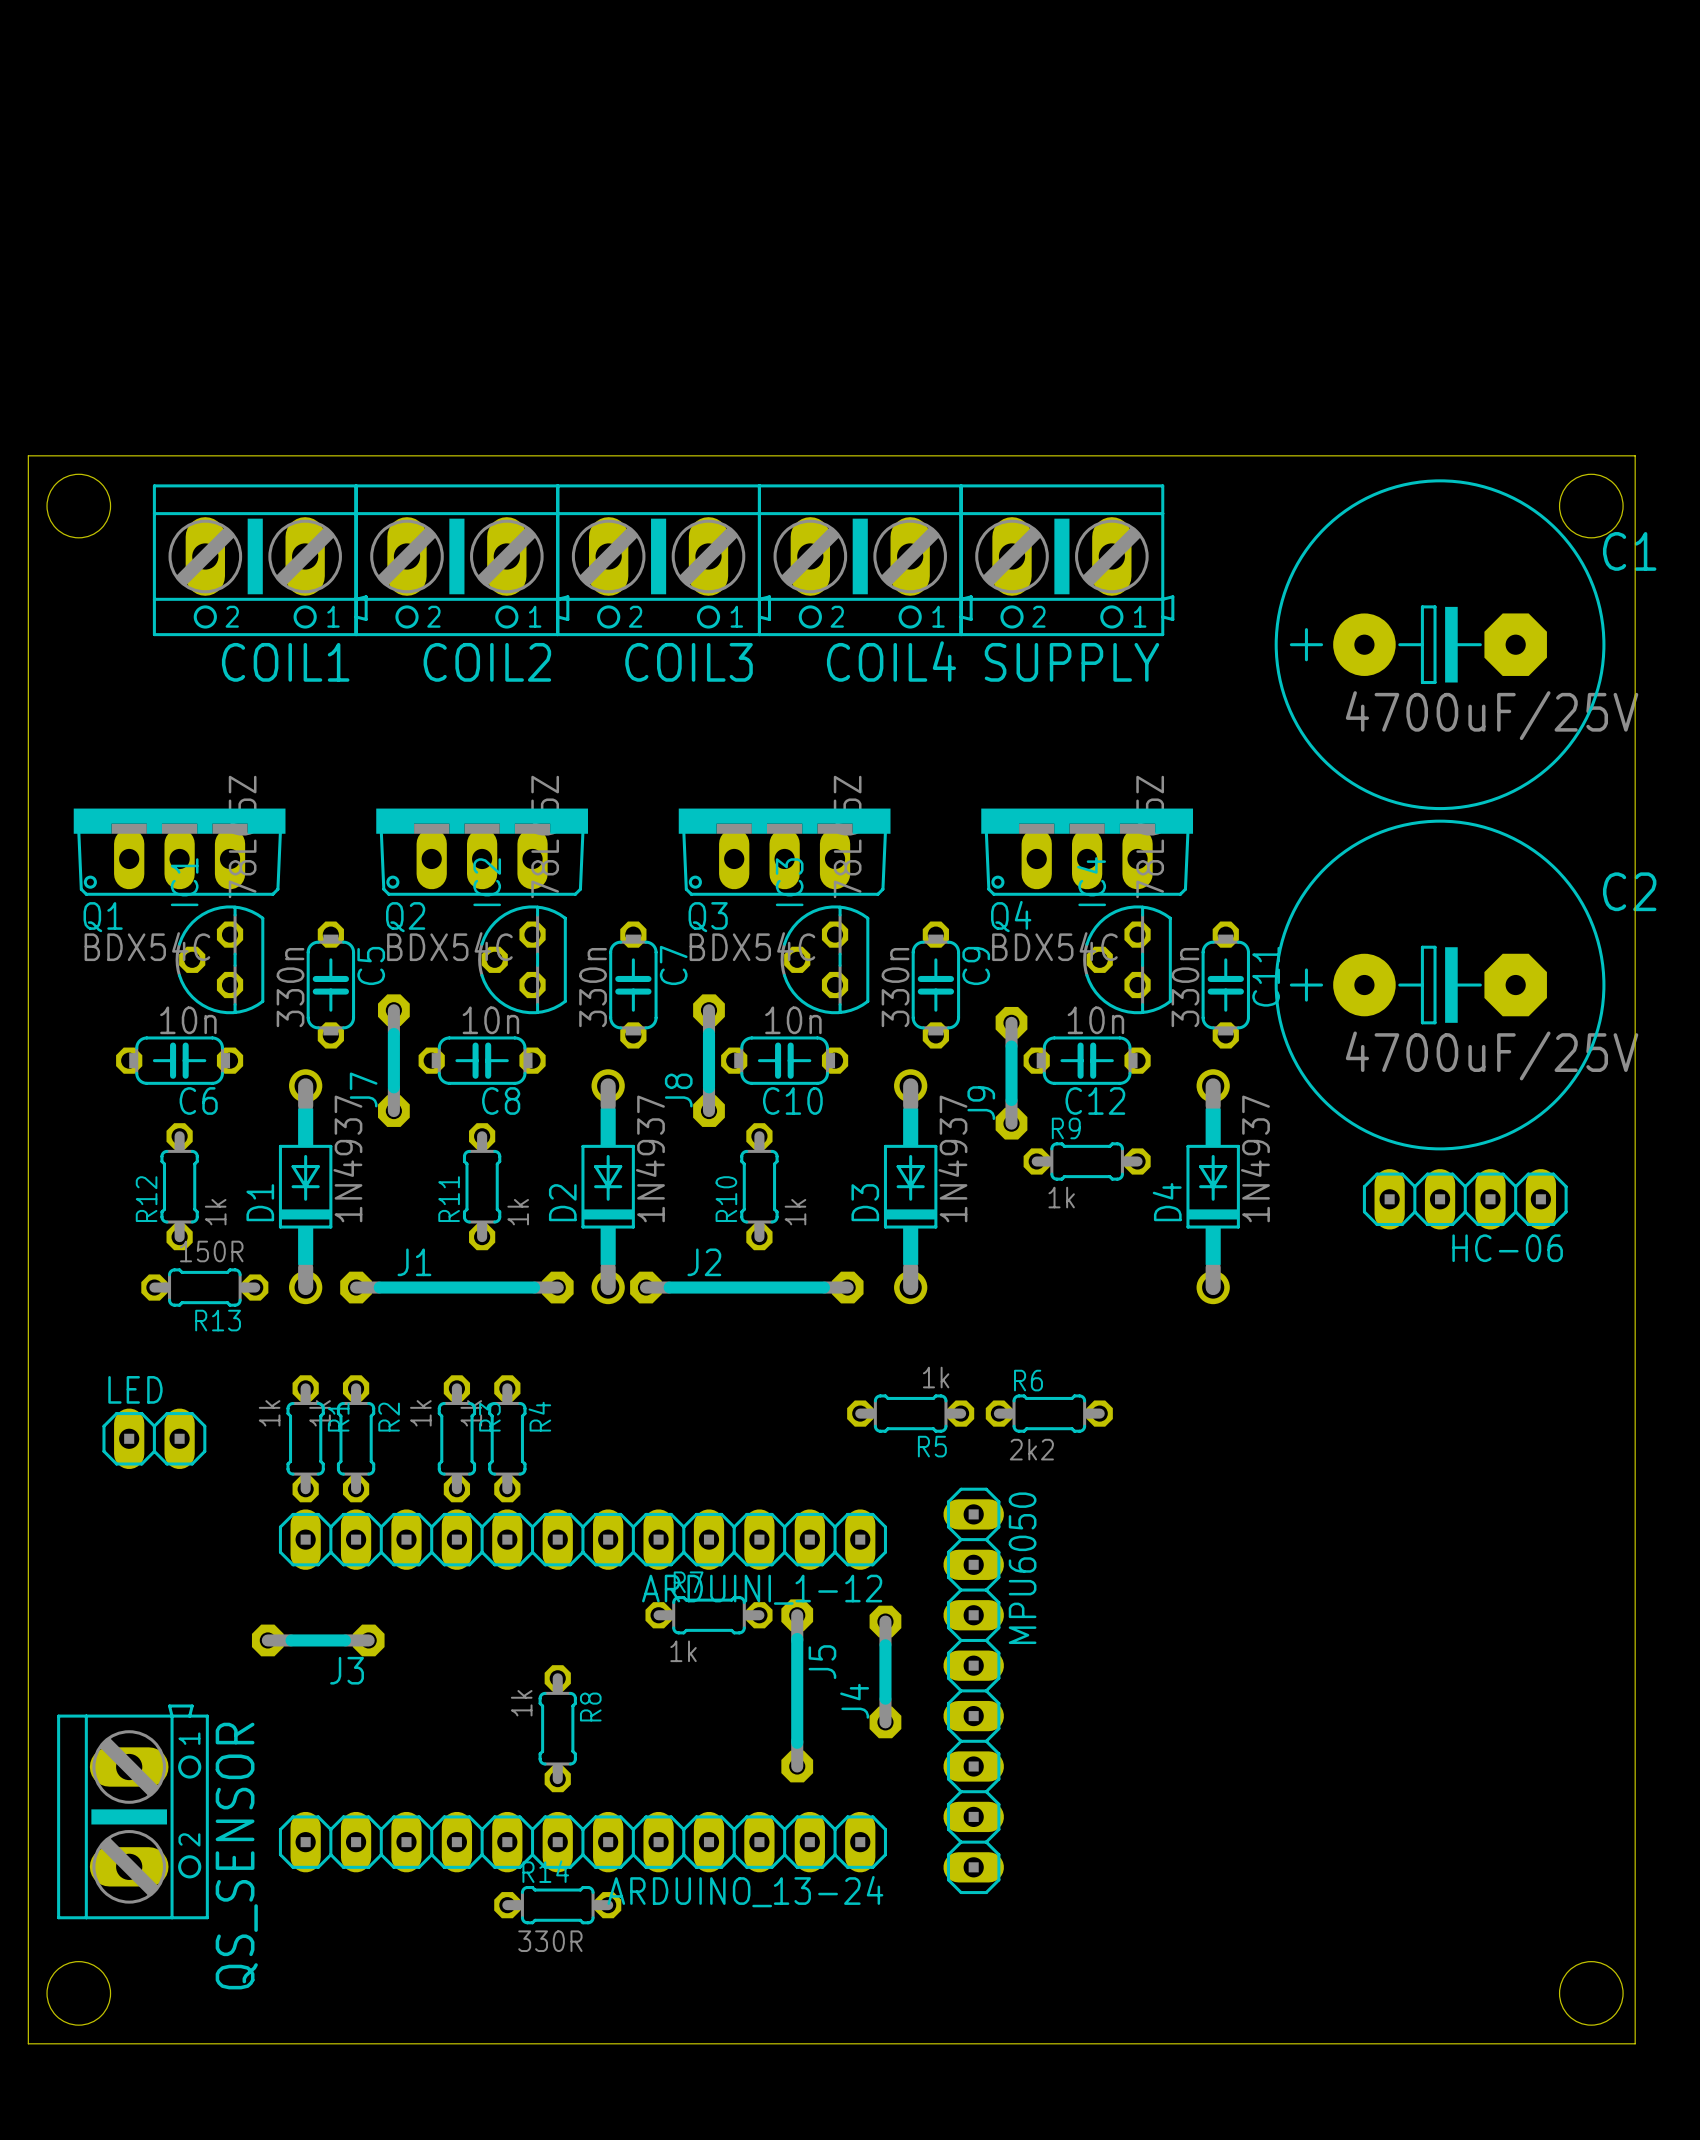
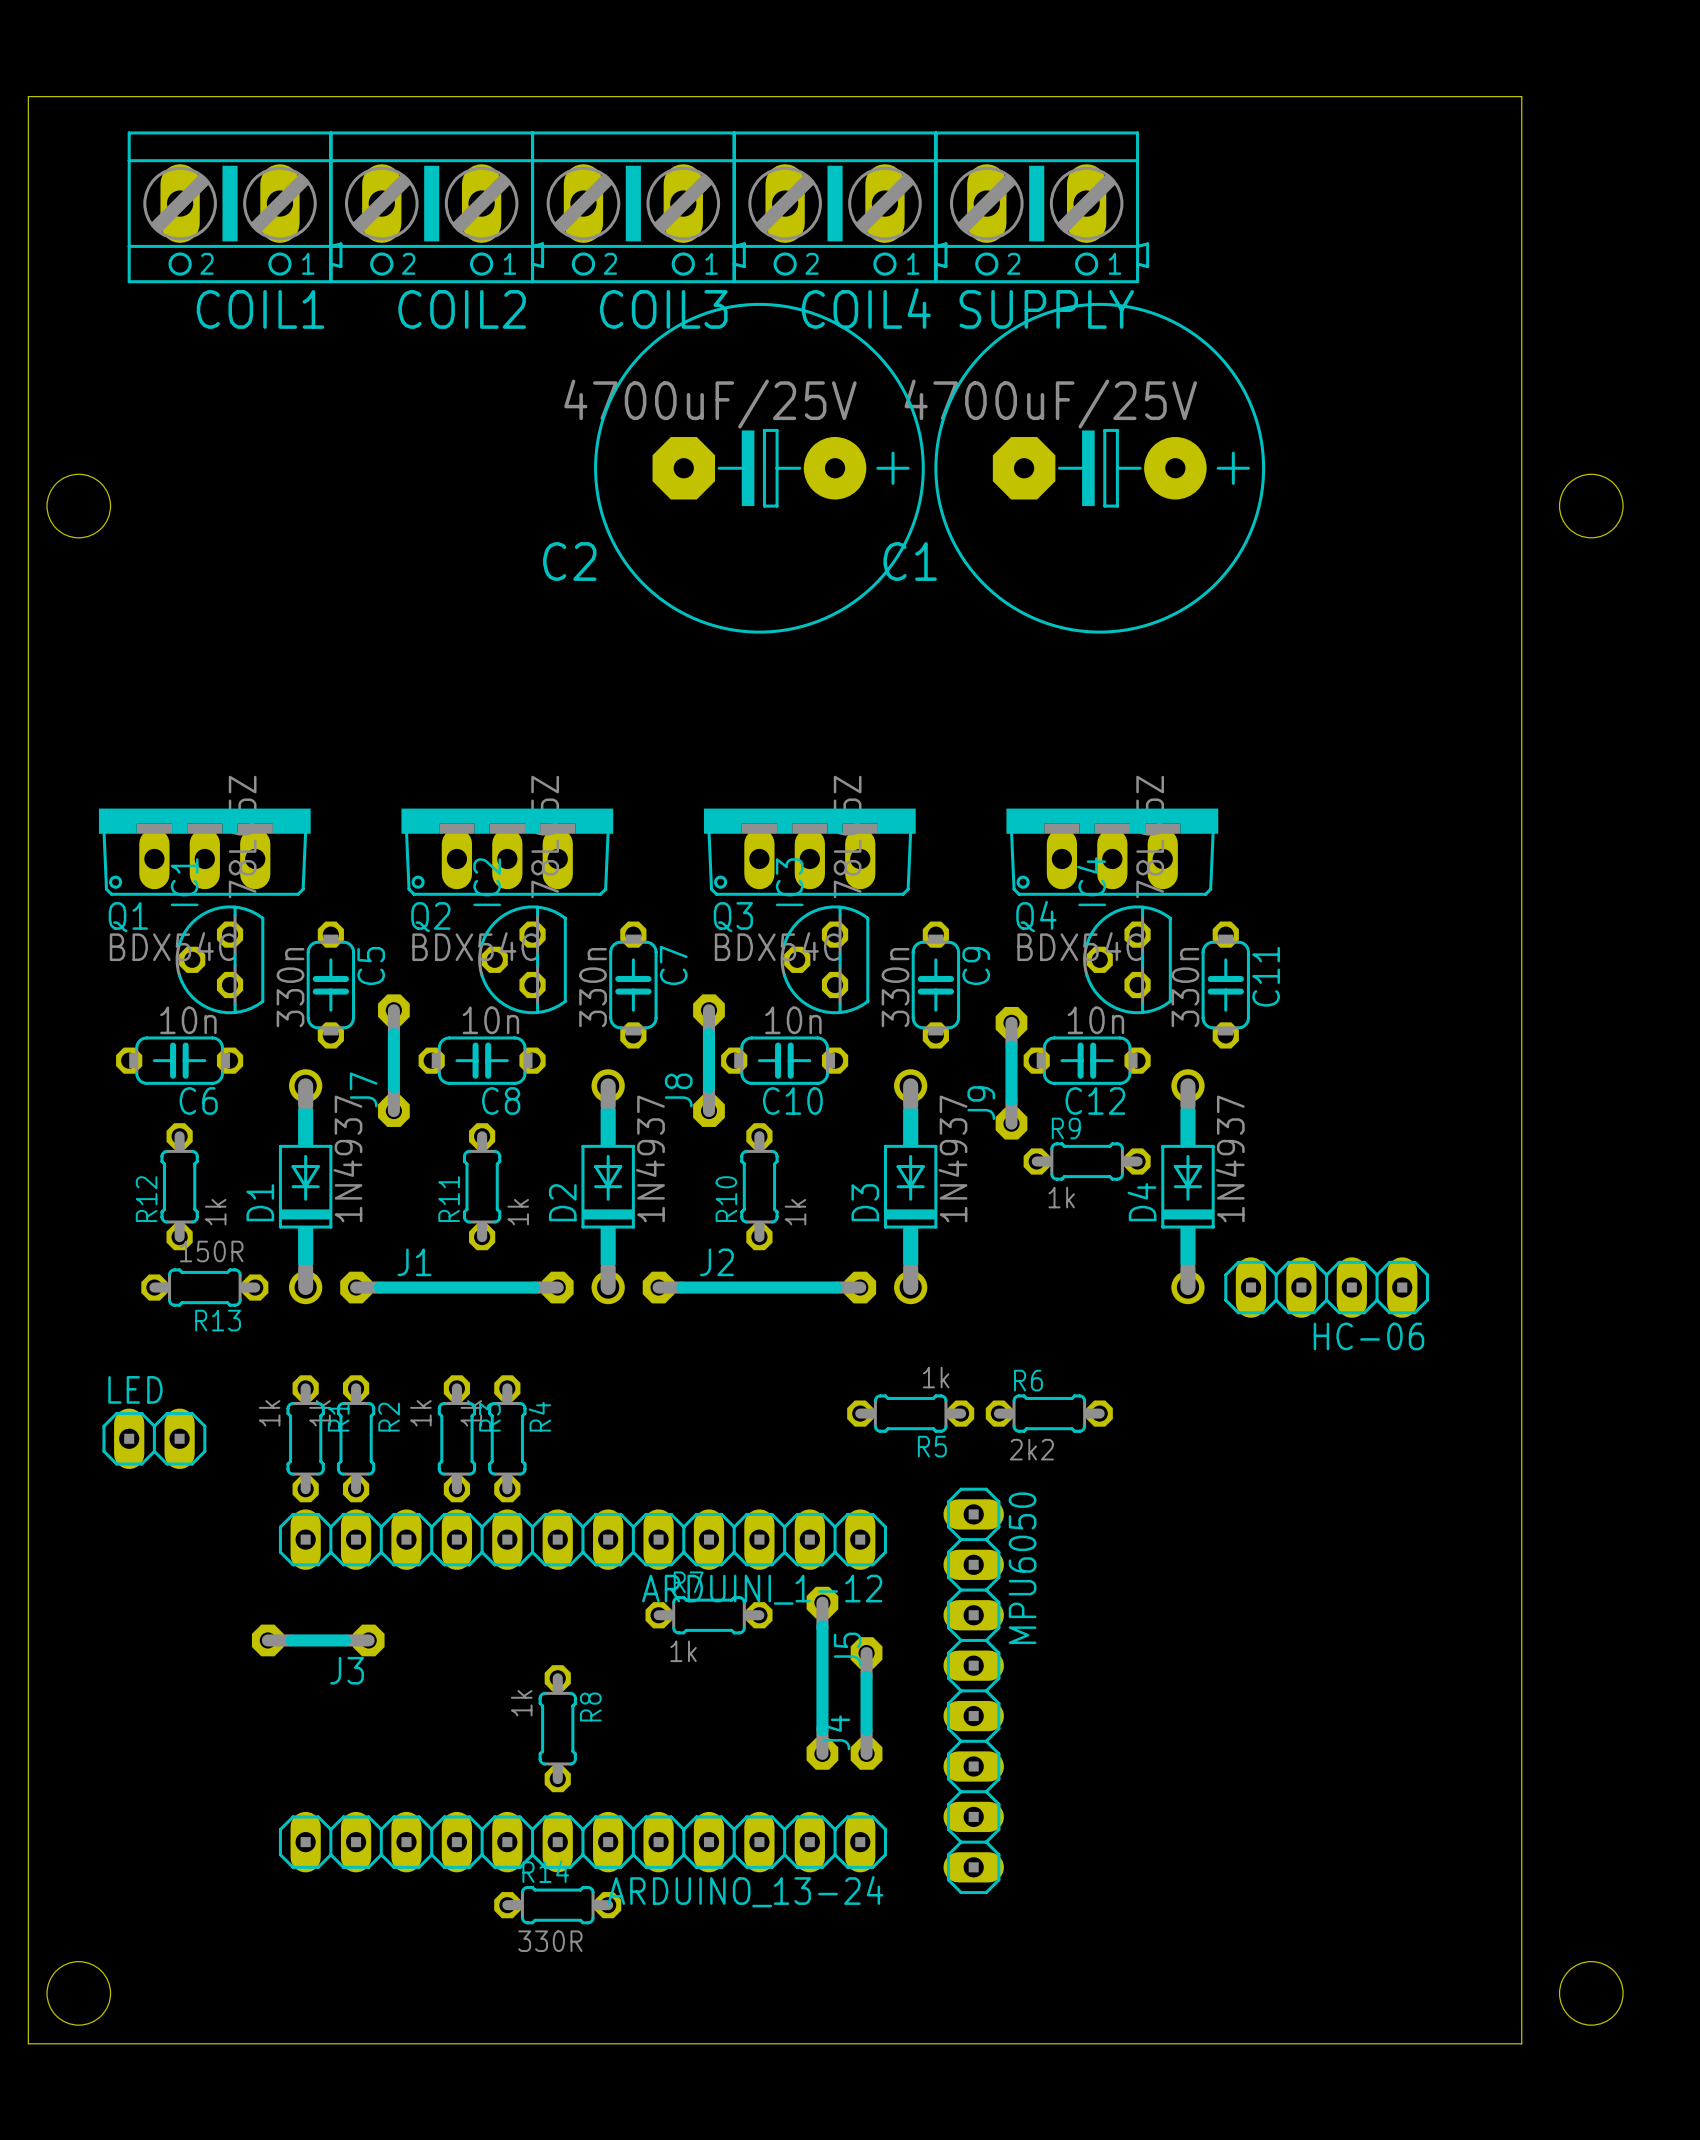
board edge: (28, 455) (1635, 455) (1635, 2043) (1521, 2043) -> (28, 455) (28, 96) (1521, 96) (1521, 2043)
COIL1 position: (260, 560) -> (235, 207)
COIL2 position: (461, 560) -> (436, 207)
COIL3 position: (663, 560) -> (638, 207)
COIL4 position: (865, 560) -> (840, 207)
SUPPLY position: (1066, 560) -> (1041, 207)
C1 rotation: 0° (1440, 644) -> 180° (1099, 468)
C1 position: (1440, 644) -> (1099, 468)
Q1 position: (179, 852) -> (204, 852)
Q2 position: (482, 852) -> (507, 852)
Q3 position: (784, 852) -> (809, 852)
Q4 position: (1087, 852) -> (1112, 852)
C2 rotation: 0° (1440, 985) -> 180° (759, 468)
C2 position: (1440, 985) -> (759, 468)
D4 position: (1213, 1186) -> (1187, 1186)
HC-06 position: (1465, 1199) -> (1326, 1287)
J2 position: (746, 1287) -> (759, 1287)
J4 position: (885, 1671) -> (866, 1703)
J5 position: (797, 1690) -> (822, 1678)
QS_SENSOR: (132, 1811) -> none

